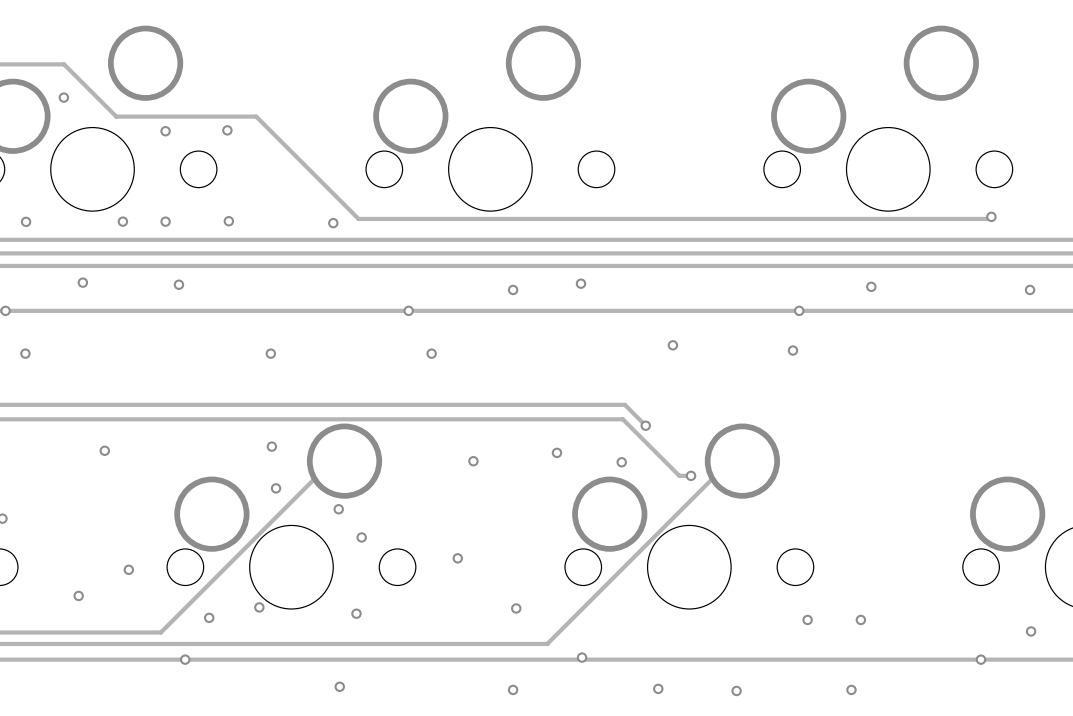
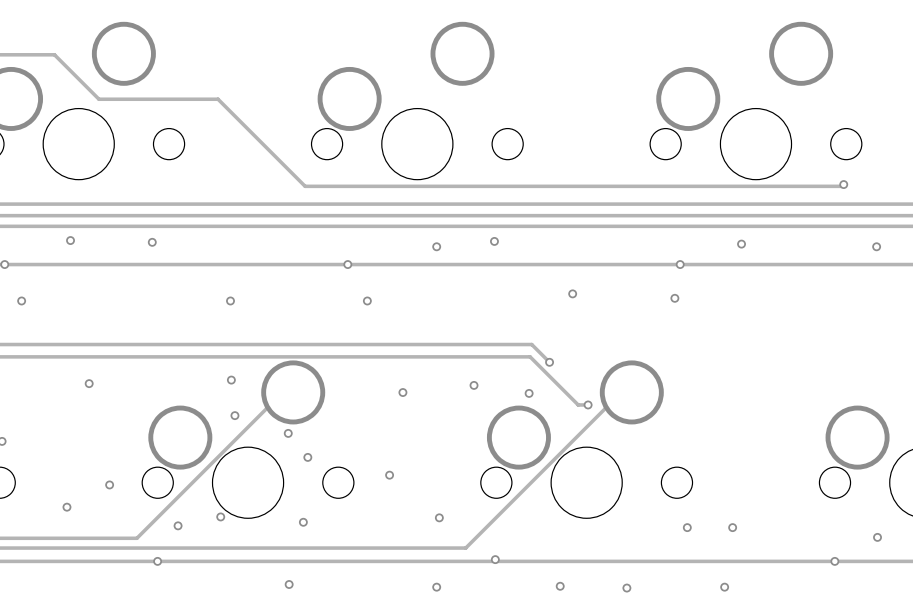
via: (63, 97) -> none
via: (227, 130) -> none
via: (165, 131) -> none
via: (26, 221) -> none
via: (122, 221) -> none
via: (165, 221) -> none
via: (228, 221) -> none
via: (333, 223) -> none

